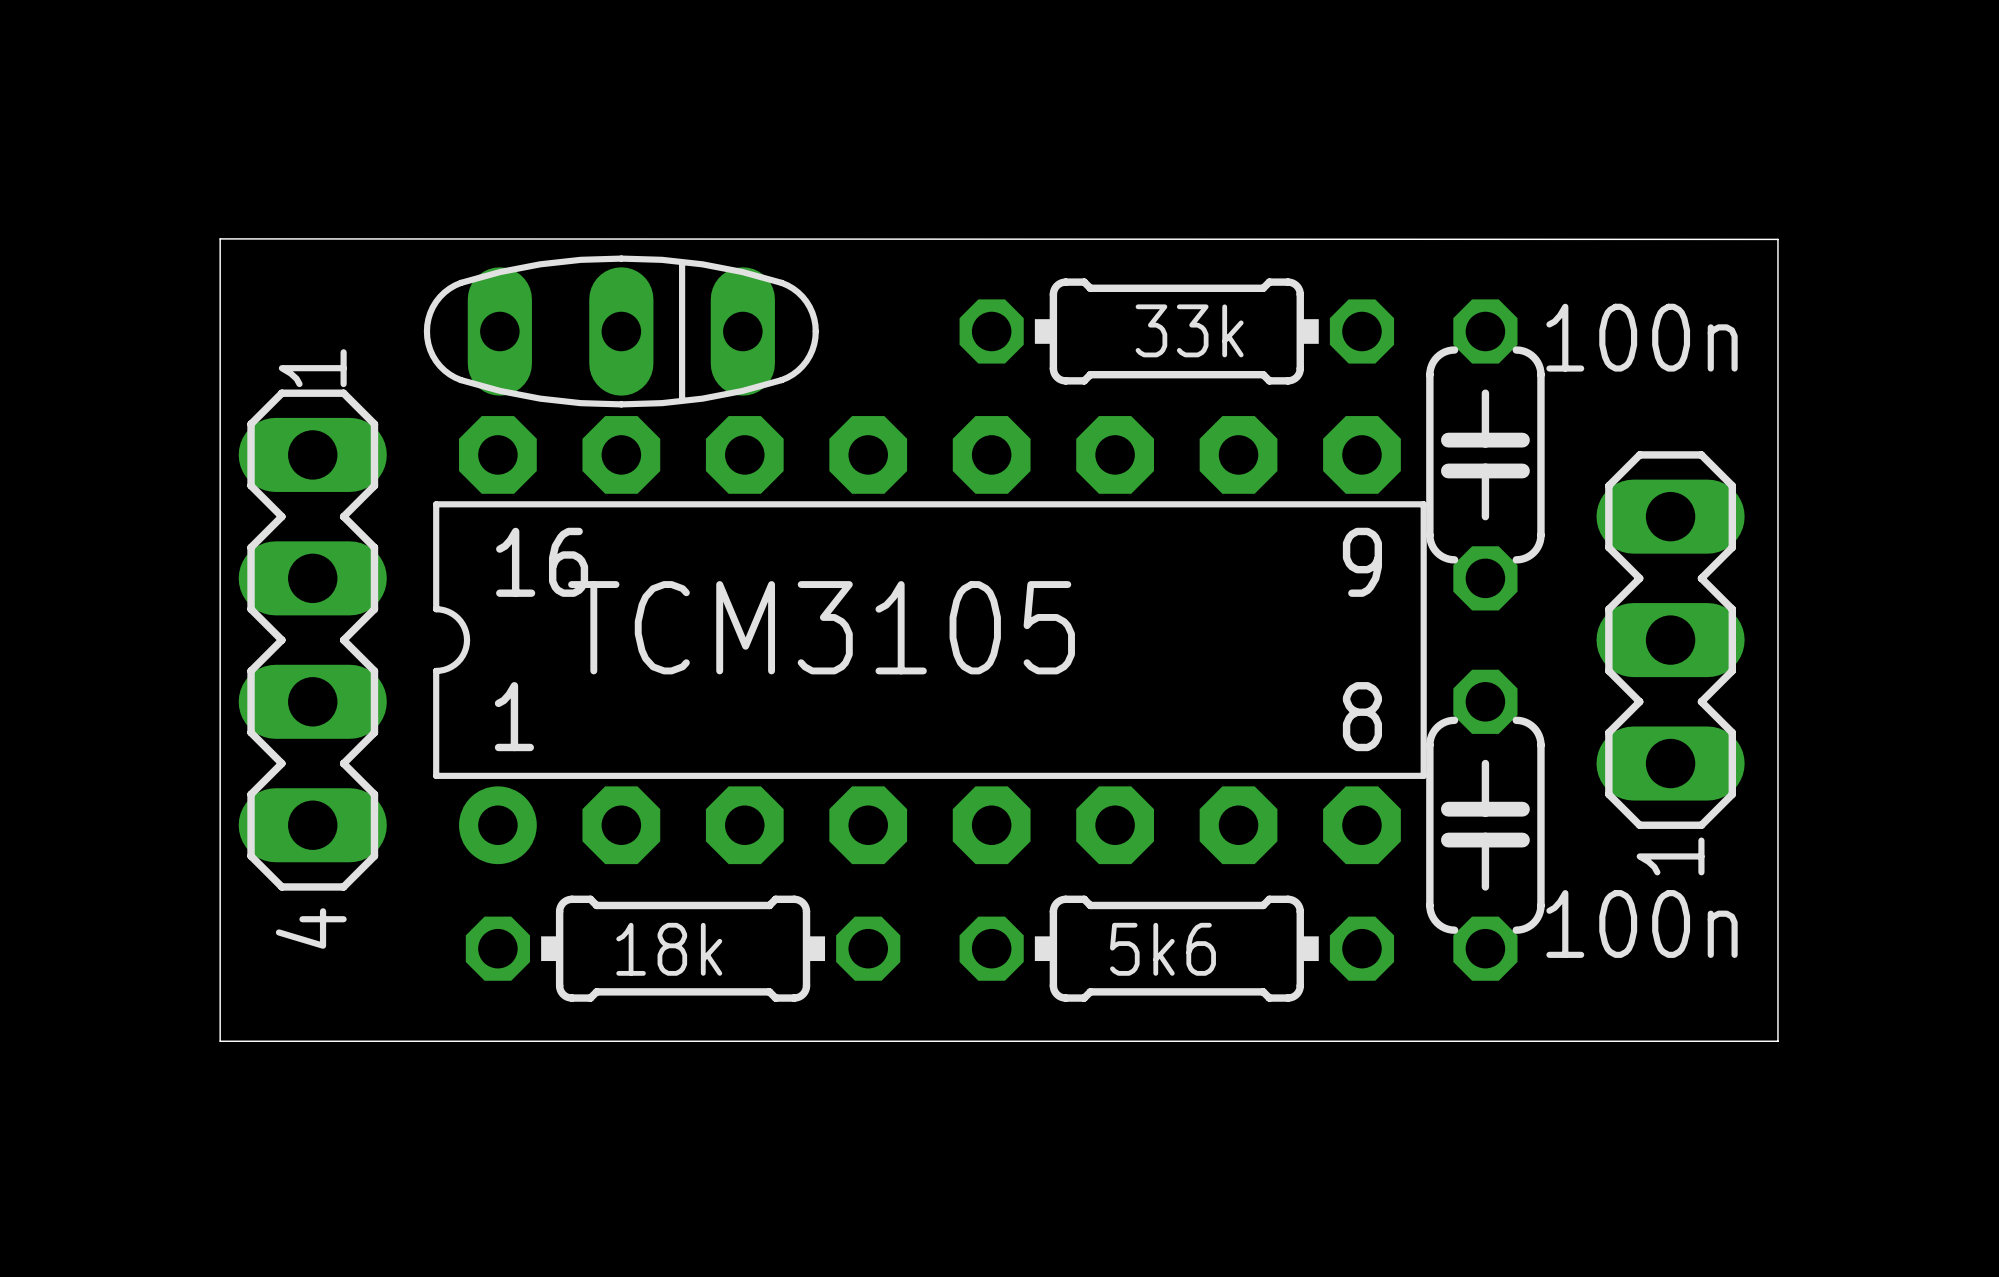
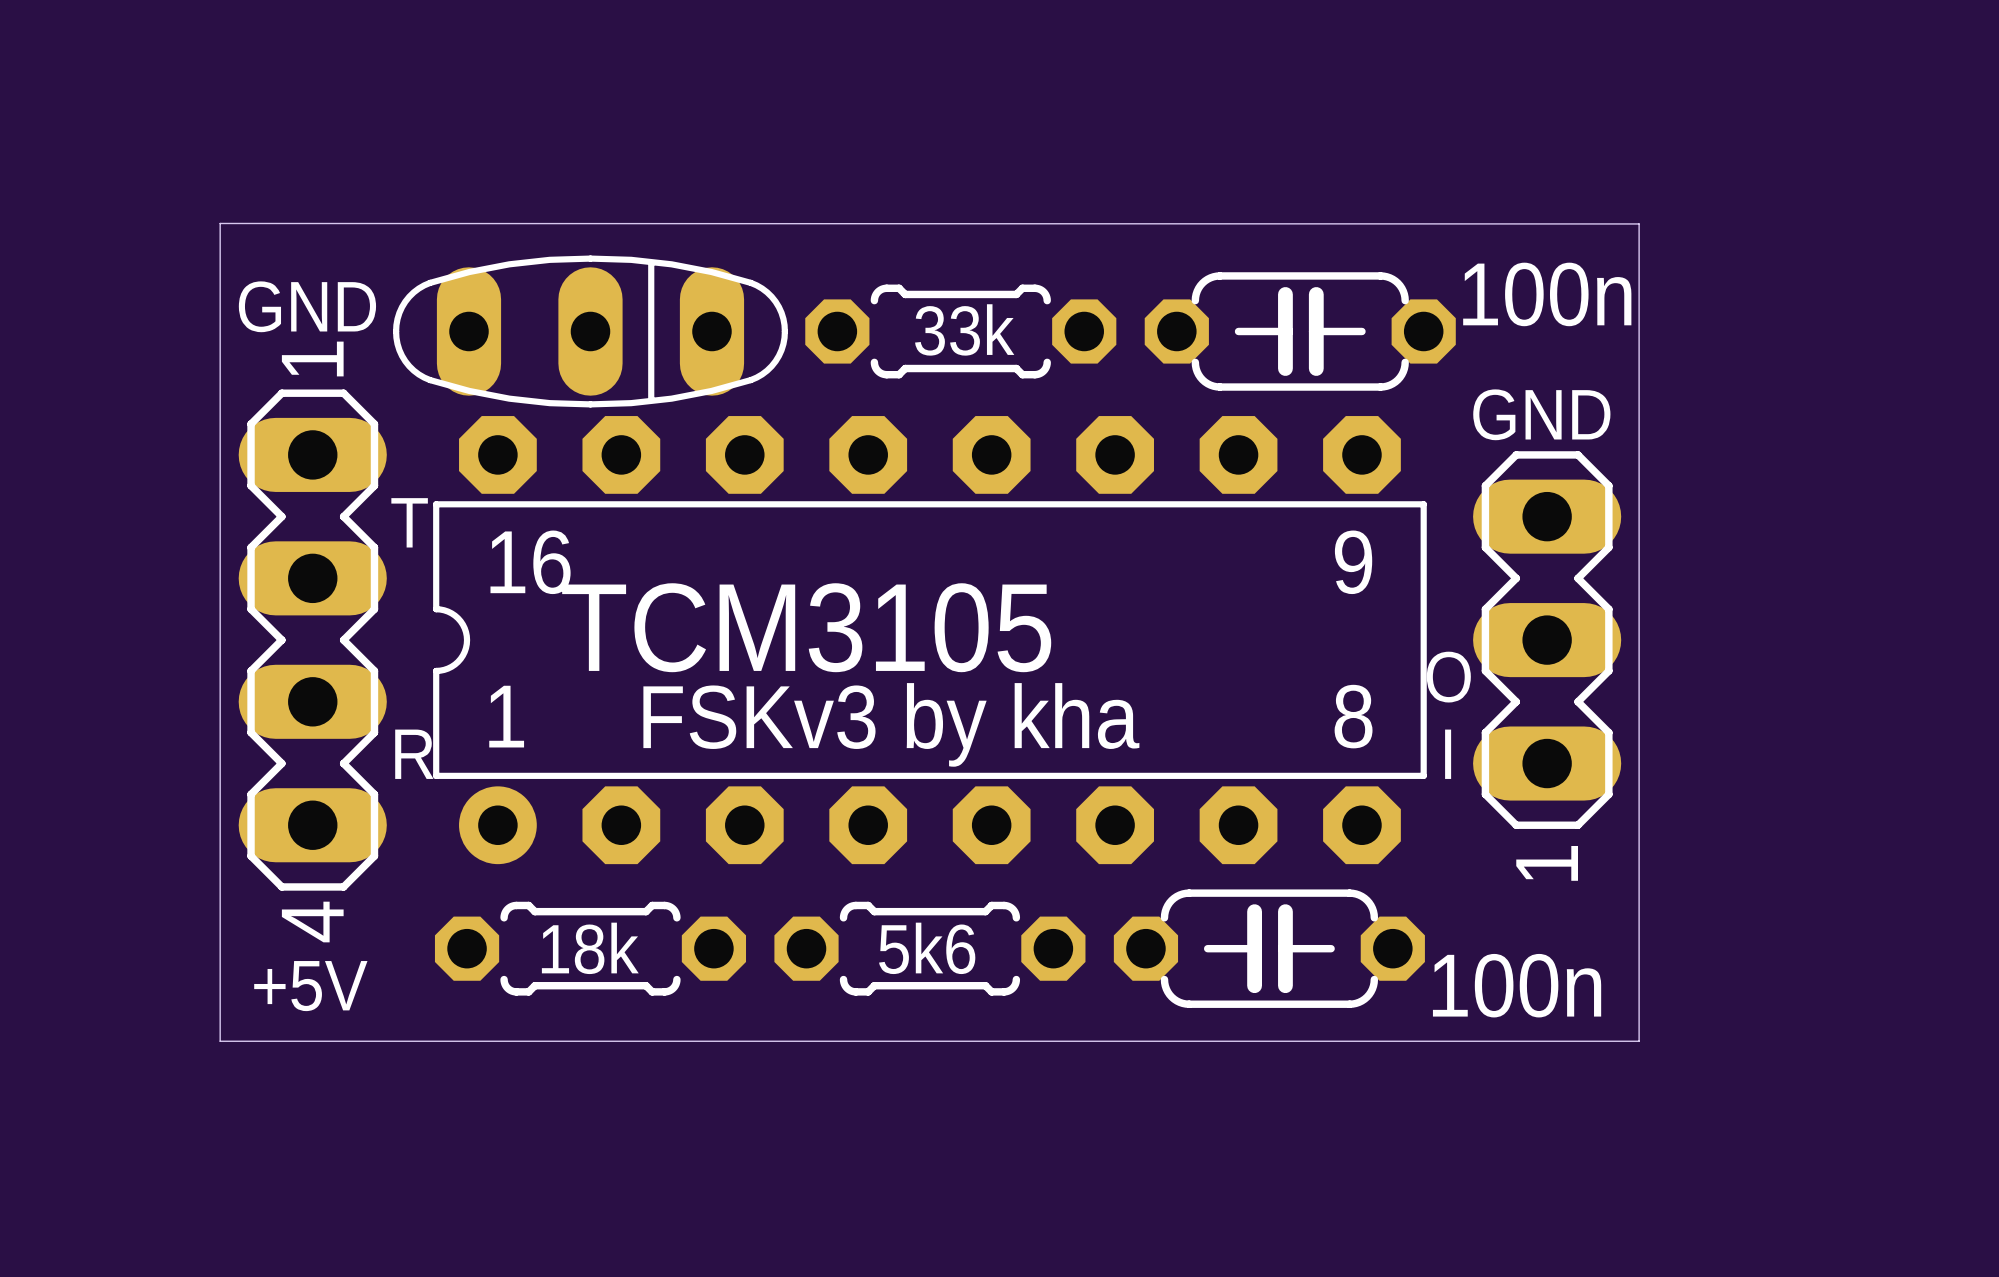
board edge: (220, 238) (1777, 239) (1777, 1041) (1639, 1041) -> (220, 238) (220, 223) (1639, 223) (1639, 1041)
text: none -> GND (307, 306)
part position: (621, 331) -> (590, 331)
part: none -> 33k (960, 331)
part: 33k (1176, 331) -> none
text: none -> GND (1541, 414)
part rotation: 0° (1485, 454) -> 90° counterclockwise (1300, 331)
part position: (1485, 454) -> (1300, 331)
text: none -> T (409, 522)
part position: (1670, 640) -> (1547, 640)
text: none -> O (1448, 677)
text: none -> FSKv3 by kha (891, 724)
text: none -> R (414, 754)
text: none -> I (1448, 754)
part rotation: 0° (1485, 825) -> 90° clockwise (1269, 948)
part position: (1485, 825) -> (1269, 948)
part value position: 100n (1642, 923) -> 100n (1517, 985)
part: none -> 18k (590, 948)
part: 18k (683, 948) -> none
part: none -> 5k6 (929, 948)
part: 5k6 (1176, 948) -> none
text: none -> +5V (310, 986)

